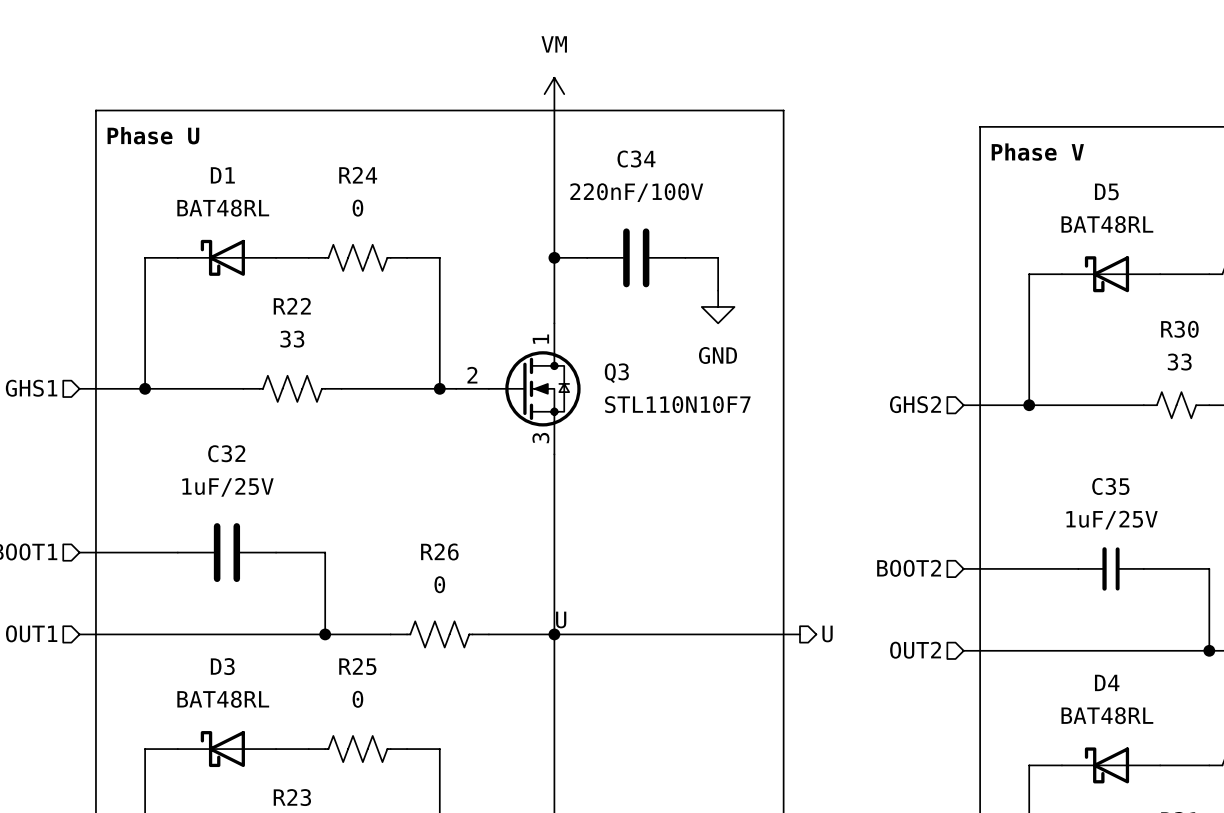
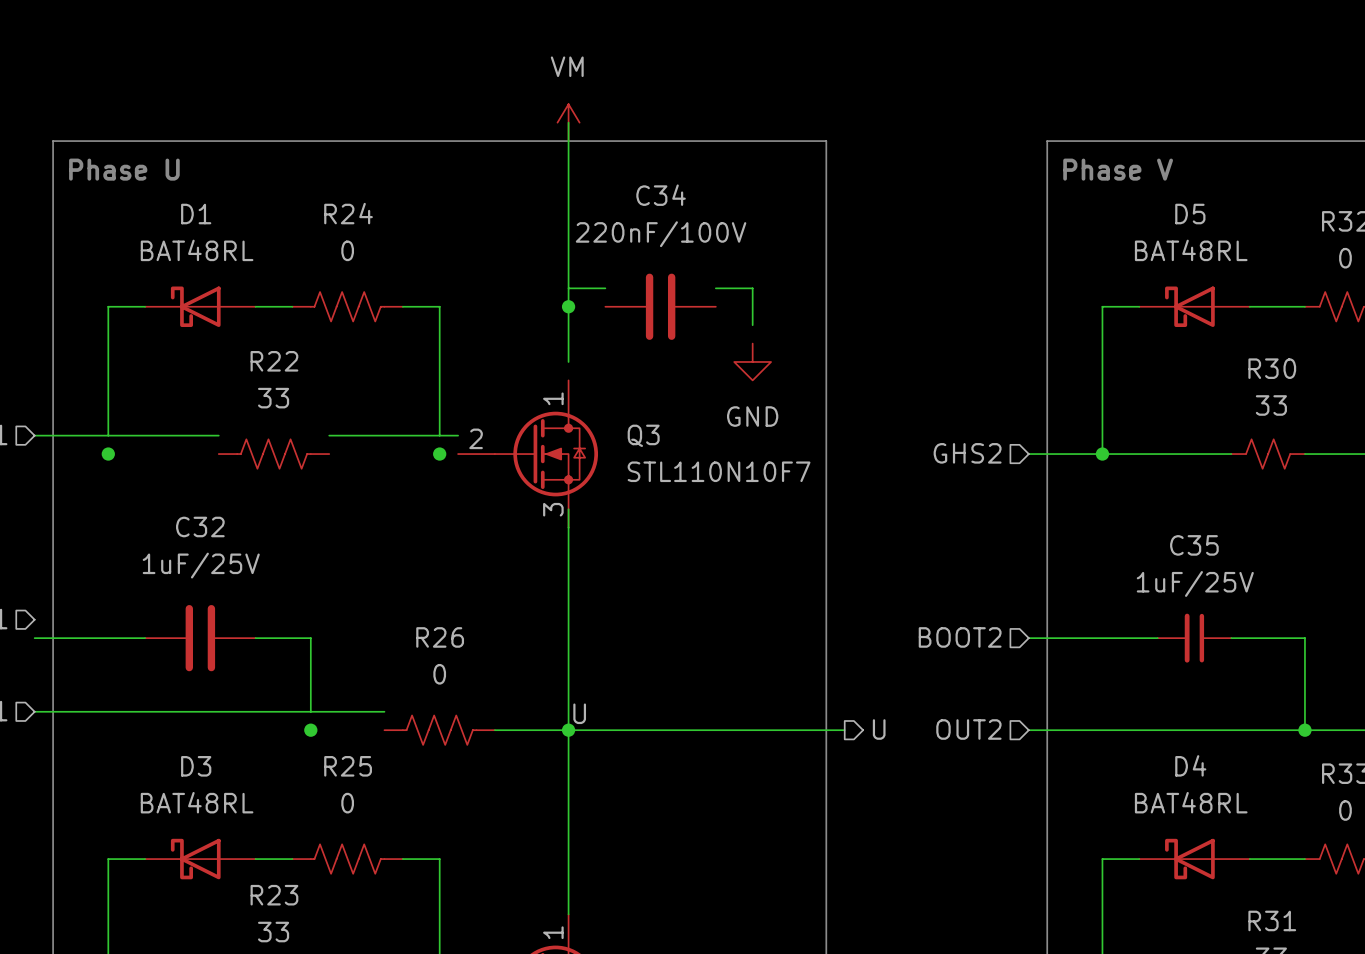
power symbol position: VM (554, 94) -> VM (568, 122)
line: (95, 126) (95, 110) (783, 110) (783, 126) -> (53, 141) (826, 141)
text position: Phase U (153, 135) -> Phase U (124, 169)
wire: (177, 257) (145, 257) (145, 274) -> (145, 306) (108, 306)
D1 position: (226, 257) -> (200, 306)
wire: (276, 257) (308, 257) -> (255, 306) (292, 306)
R24 position: (357, 257) -> (347, 306)
wire: (407, 257) (439, 257) (439, 274) -> (402, 306) (439, 306)
junction position: (554, 257) -> (568, 306)
C34 position: (636, 257) -> (660, 306)
power symbol position: GND (718, 306) -> GND (752, 361)
junction position: (145, 388) -> (108, 454)
R22 position: (292, 388) -> (274, 454)
junction position: (439, 388) -> (439, 454)
Q3 position: (518, 388) -> (528, 454)
wire: (79, 552) (177, 552) -> (34, 638) (145, 638)
C32 position: (226, 552) -> (200, 638)
wire: (276, 552) (325, 552) (325, 568) -> (255, 638) (310, 638)
label position: U (561, 619) -> U (579, 713)
hierarchical label position: U (827, 633) -> U (879, 729)
junction position: (325, 634) -> (310, 730)
R26 position: (439, 634) -> (439, 730)
wire: (488, 634) (800, 634) -> (494, 730) (844, 730)
junction position: (554, 634) -> (568, 730)
wire: (177, 749) (145, 749) (145, 765) -> (145, 859) (108, 859)
D3 position: (226, 749) -> (200, 859)
wire: (276, 749) (308, 749) -> (255, 859) (292, 859)
R25 position: (357, 749) -> (347, 859)
wire: (407, 749) (439, 749) (439, 765) -> (402, 859) (439, 859)

